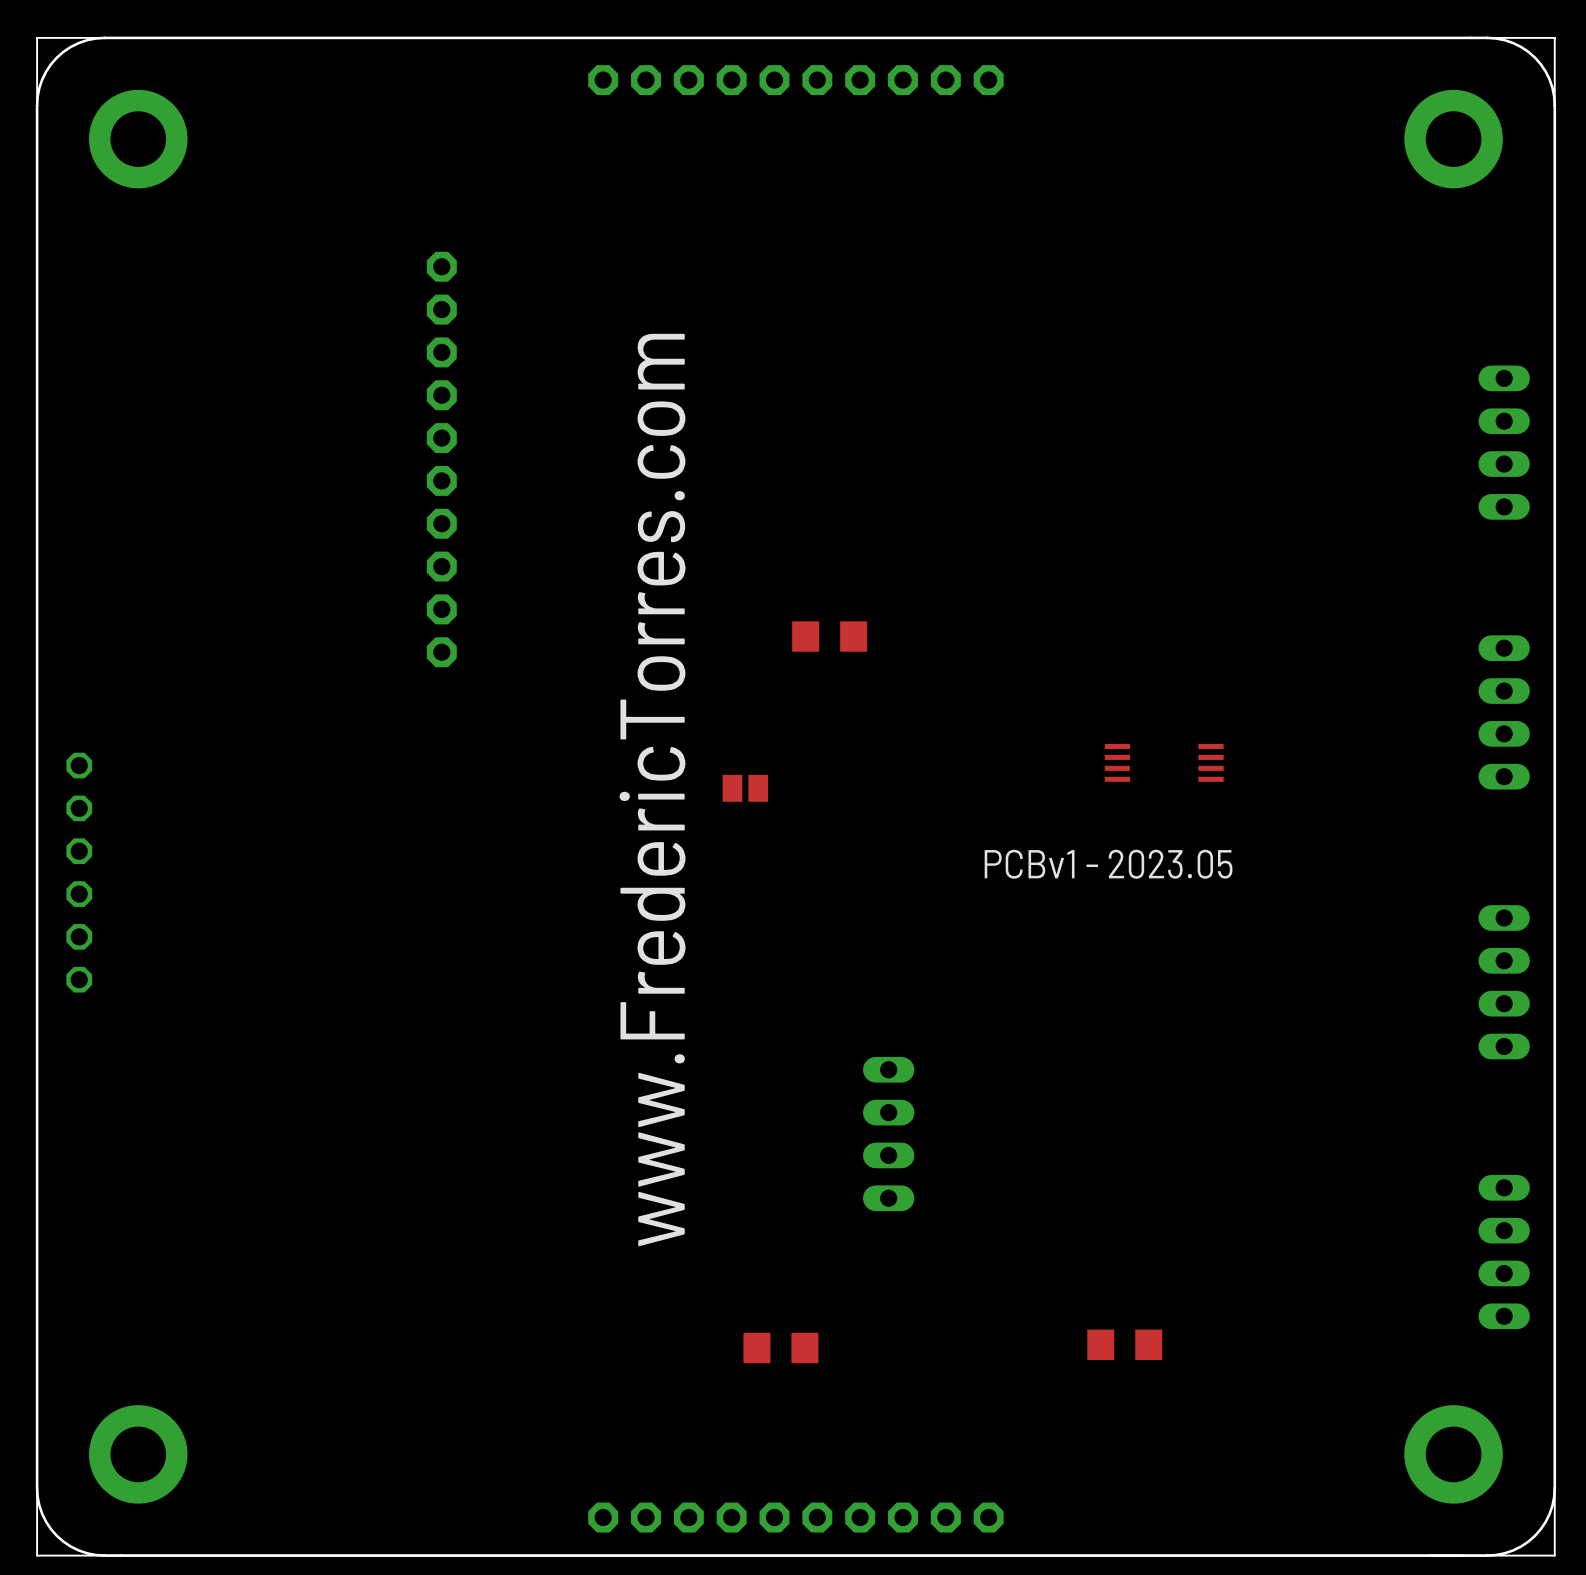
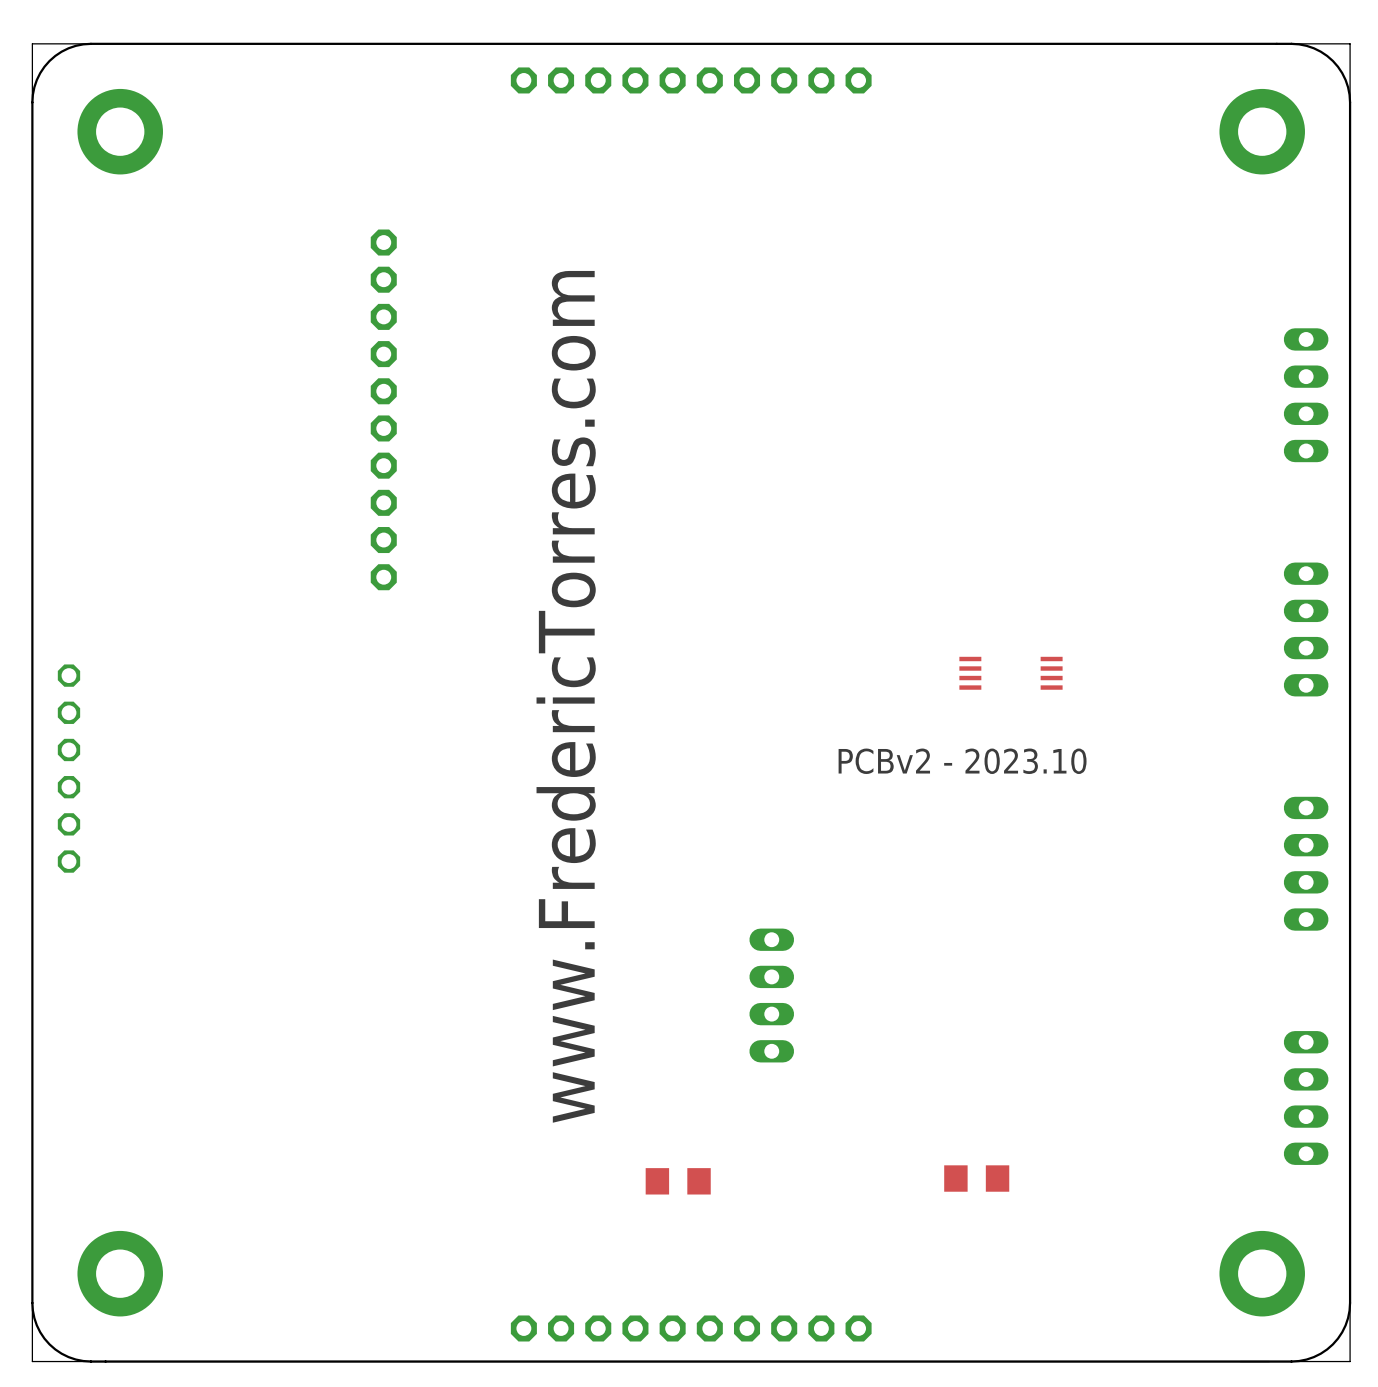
part: (829, 636) -> none
part: (745, 788) -> none
text: PCBv1 - 2023.05 (1108, 864) -> PCBv2 - 2023.10 (962, 761)

